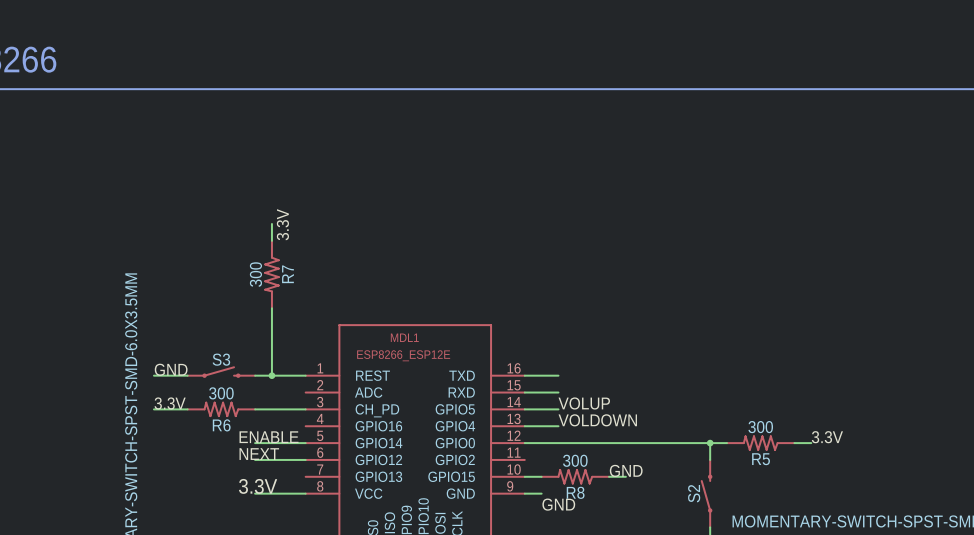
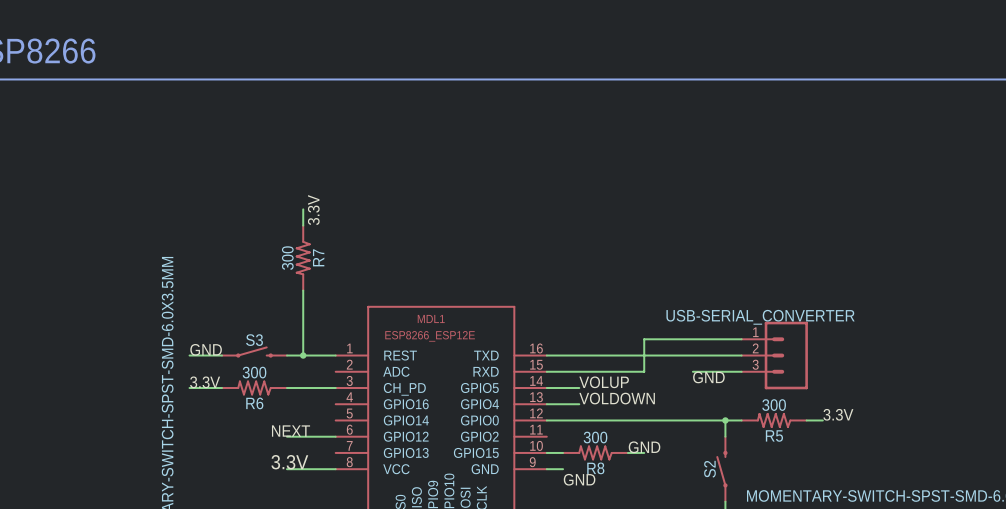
wire: none -> (741, 339) (644, 339) (644, 371) (579, 371)
wire: none -> (579, 355) (741, 355)
USB-SERIAL_CONVERTER: none -> (774, 355)
wire: none -> (692, 371) (741, 371)
label: none -> GND (708, 377)
label: ENABLE (269, 437) -> none
wire: (255, 443) (305, 443) -> none

